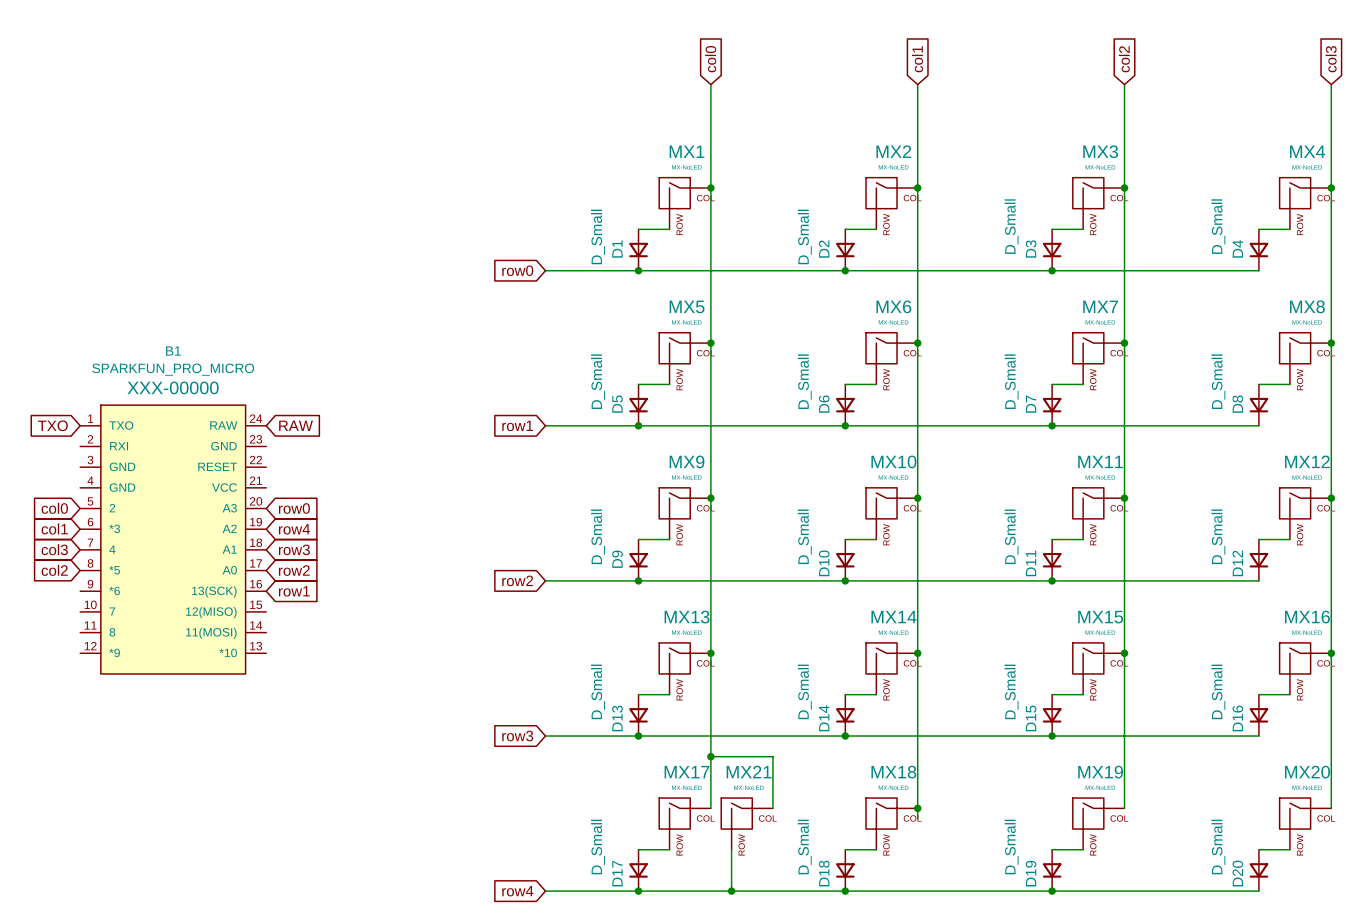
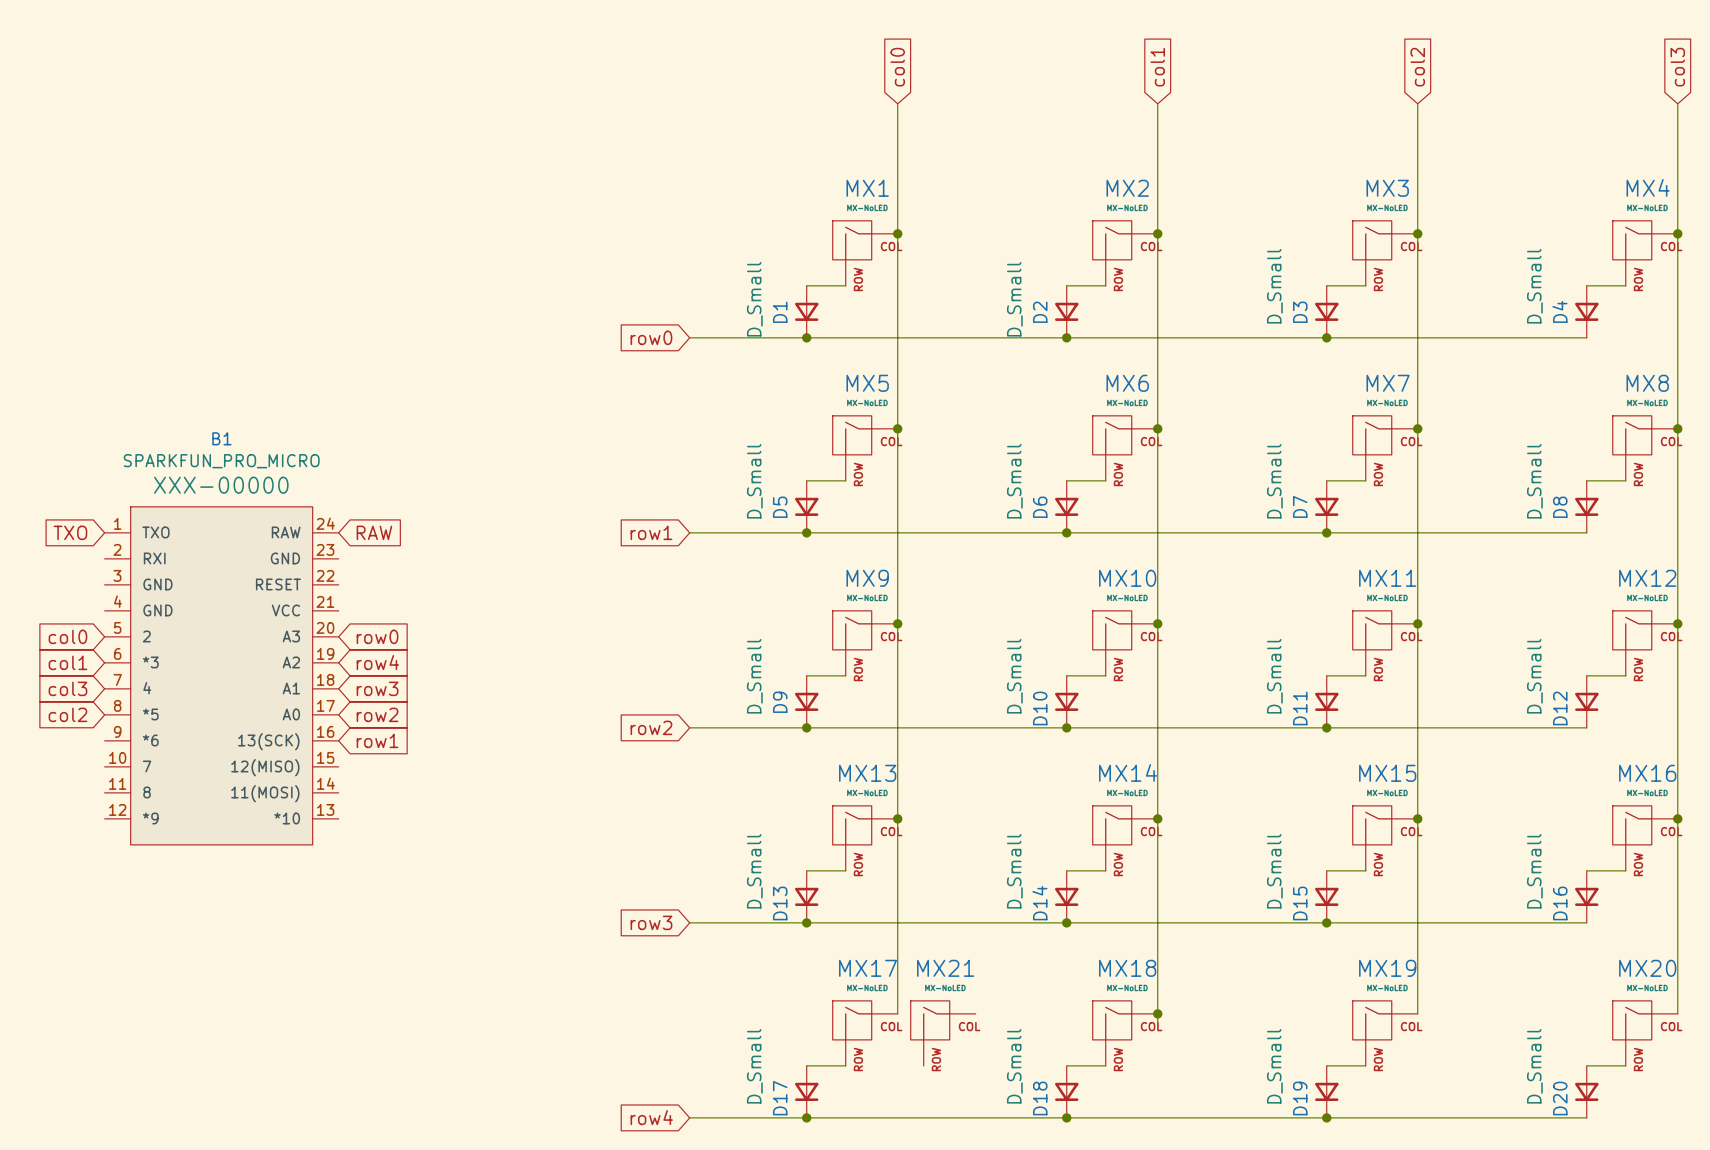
wire: (710, 756) (772, 756) (772, 808) -> none
junction: (710, 756) -> none
wire: (731, 849) (731, 891) -> none
junction: (731, 891) -> none

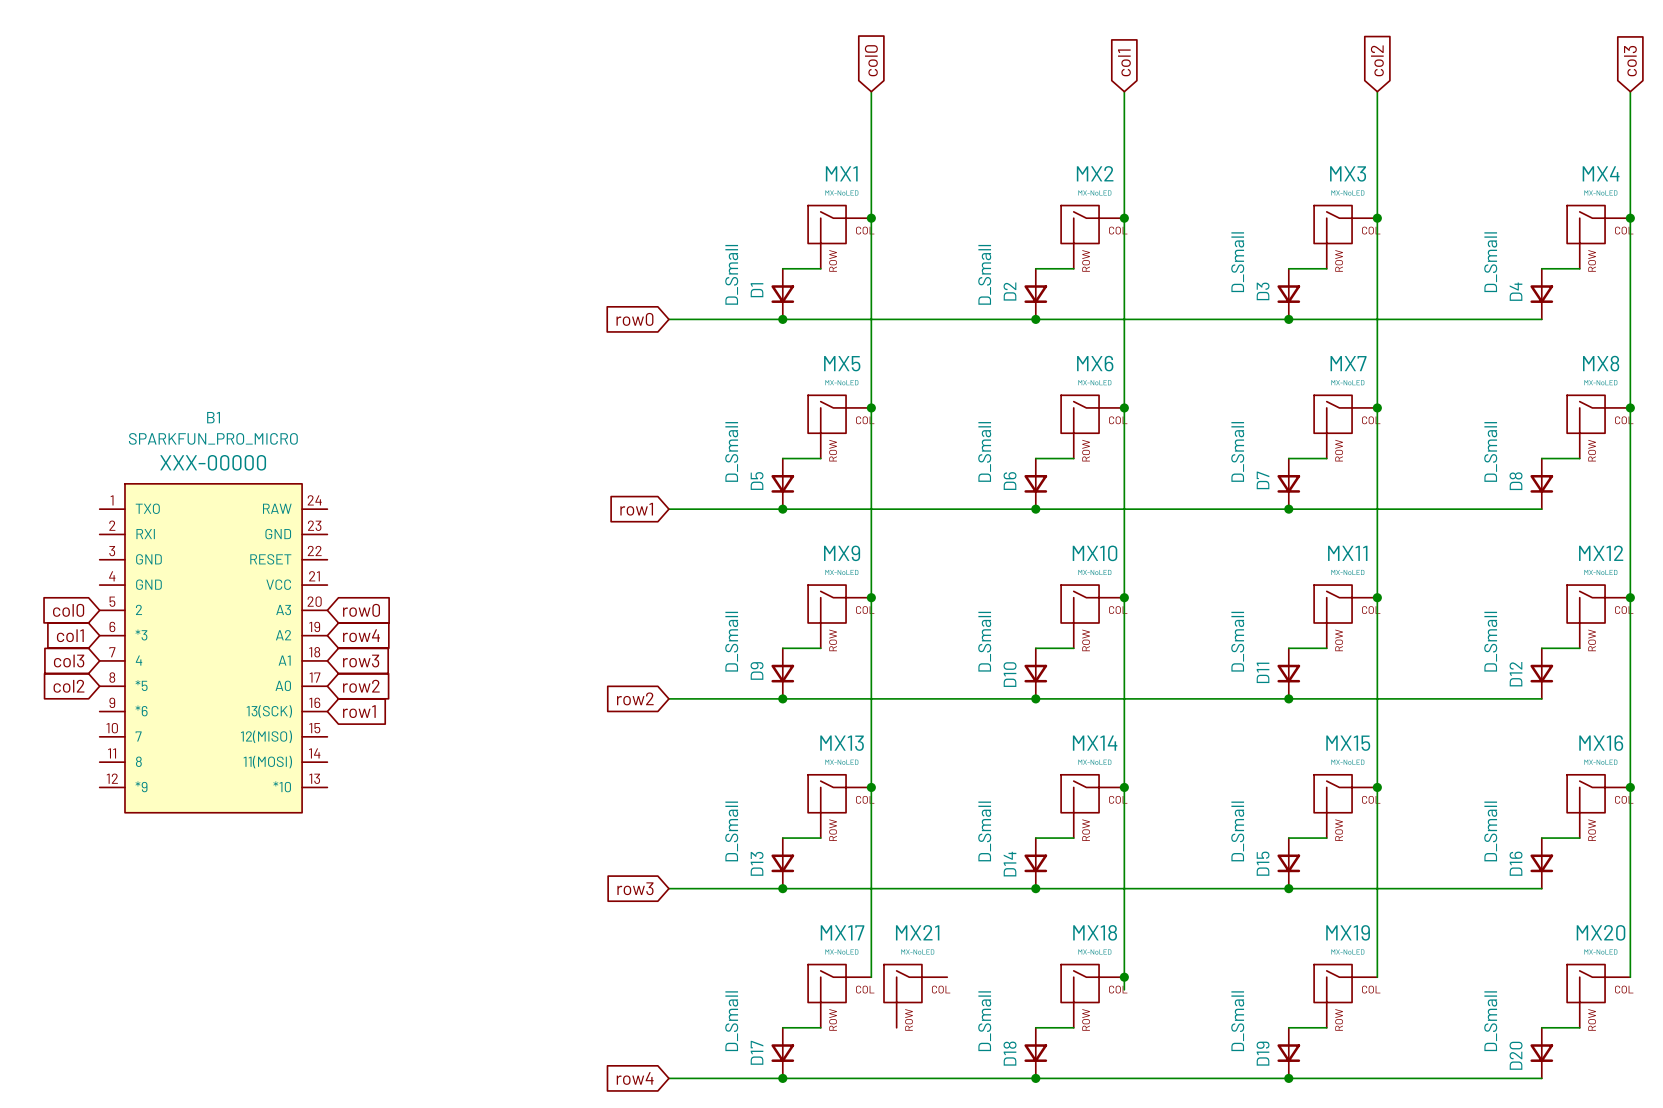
global label: TXO (70, 532) -> none
global label: RAW (374, 532) -> none

